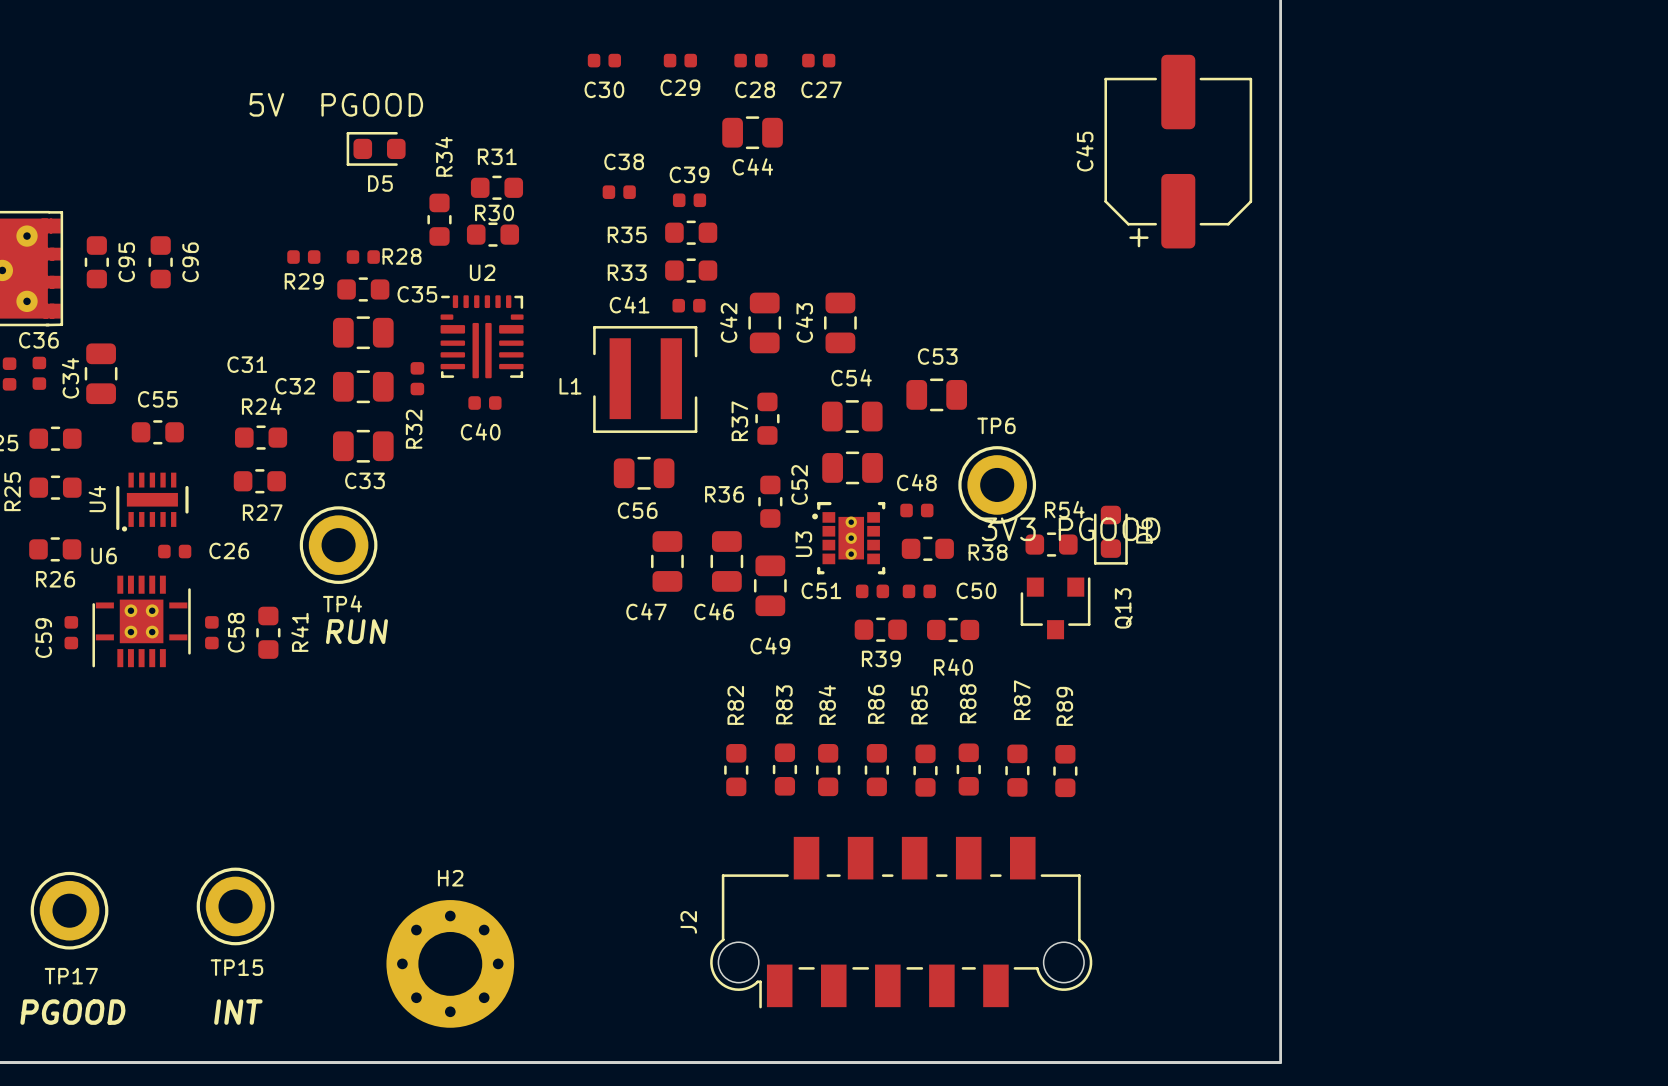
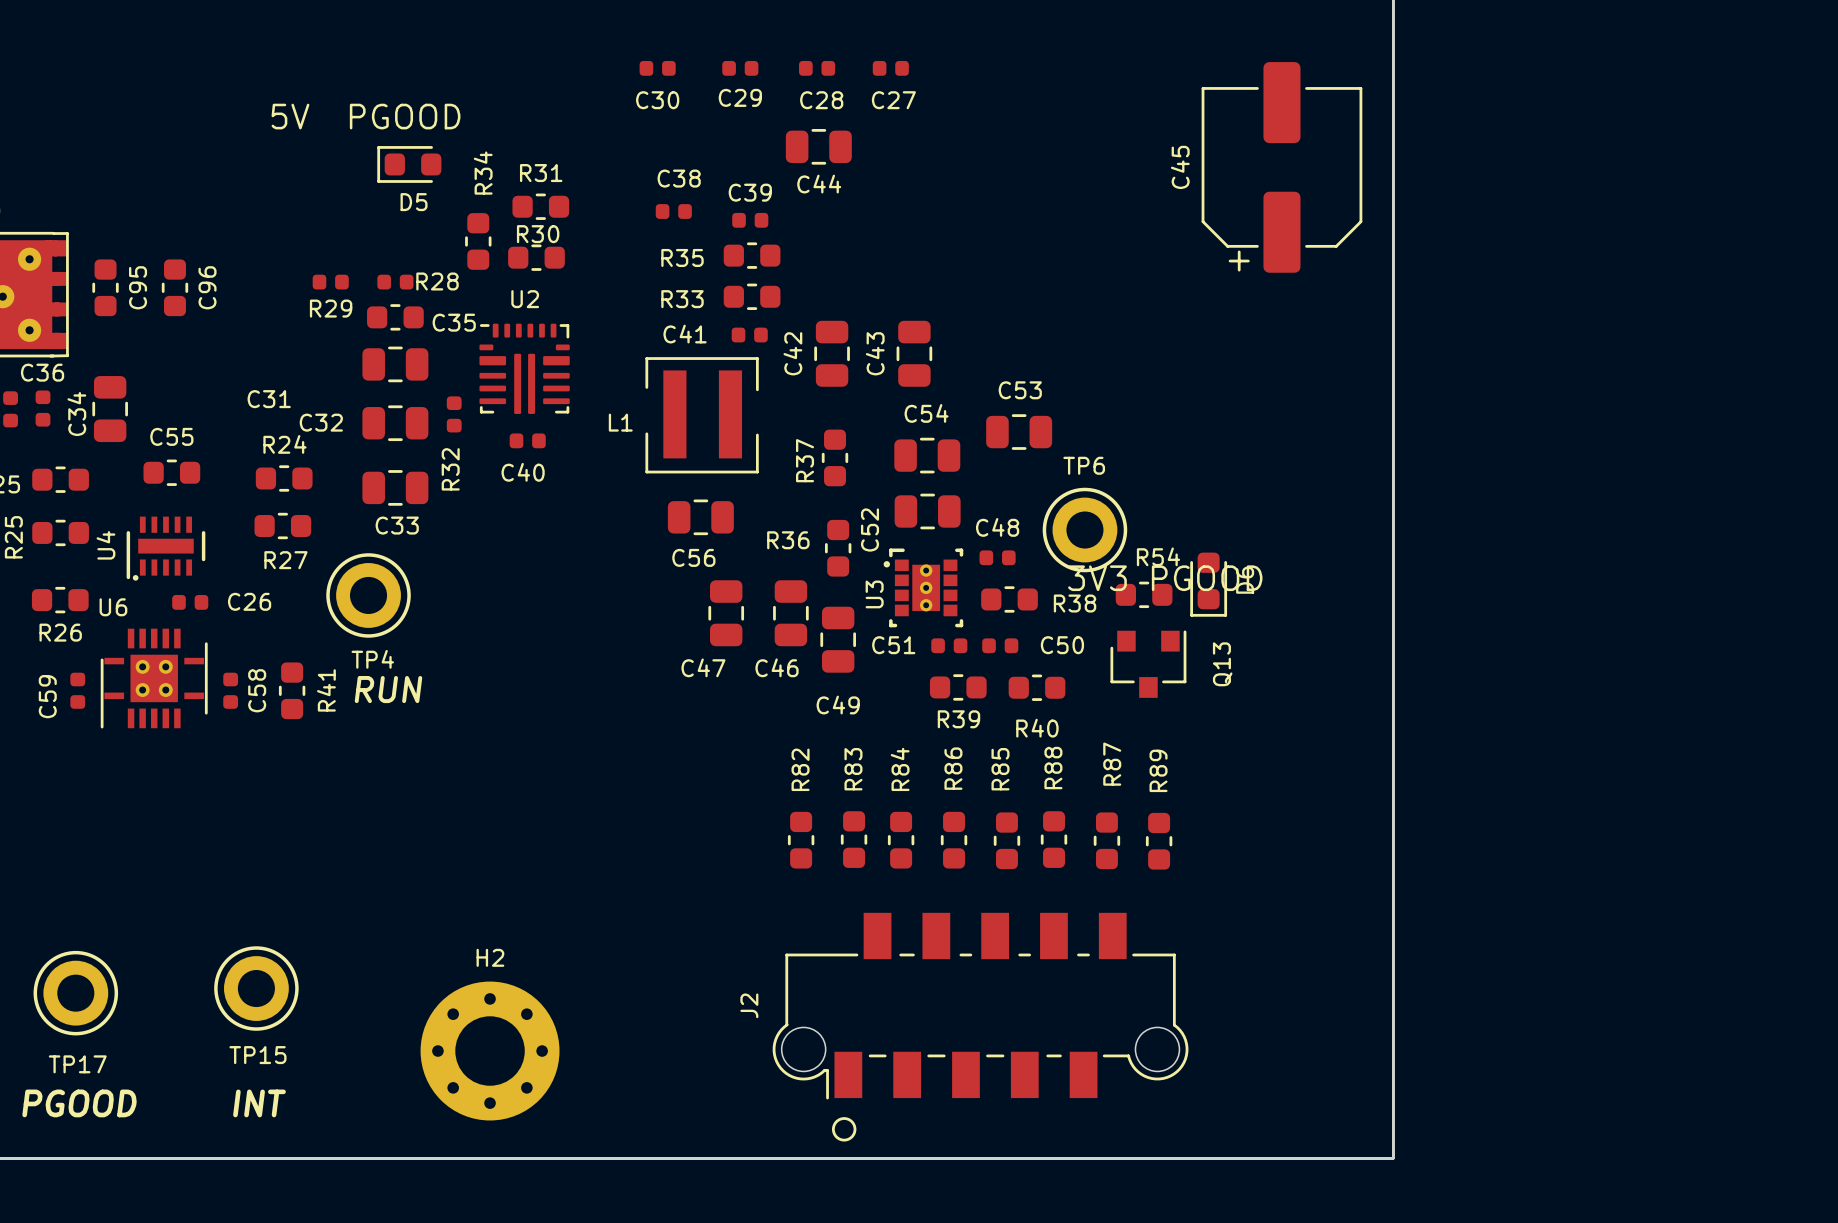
J2 footprint: [710, 836, 1093, 1009] -> [772, 912, 1189, 1142]

